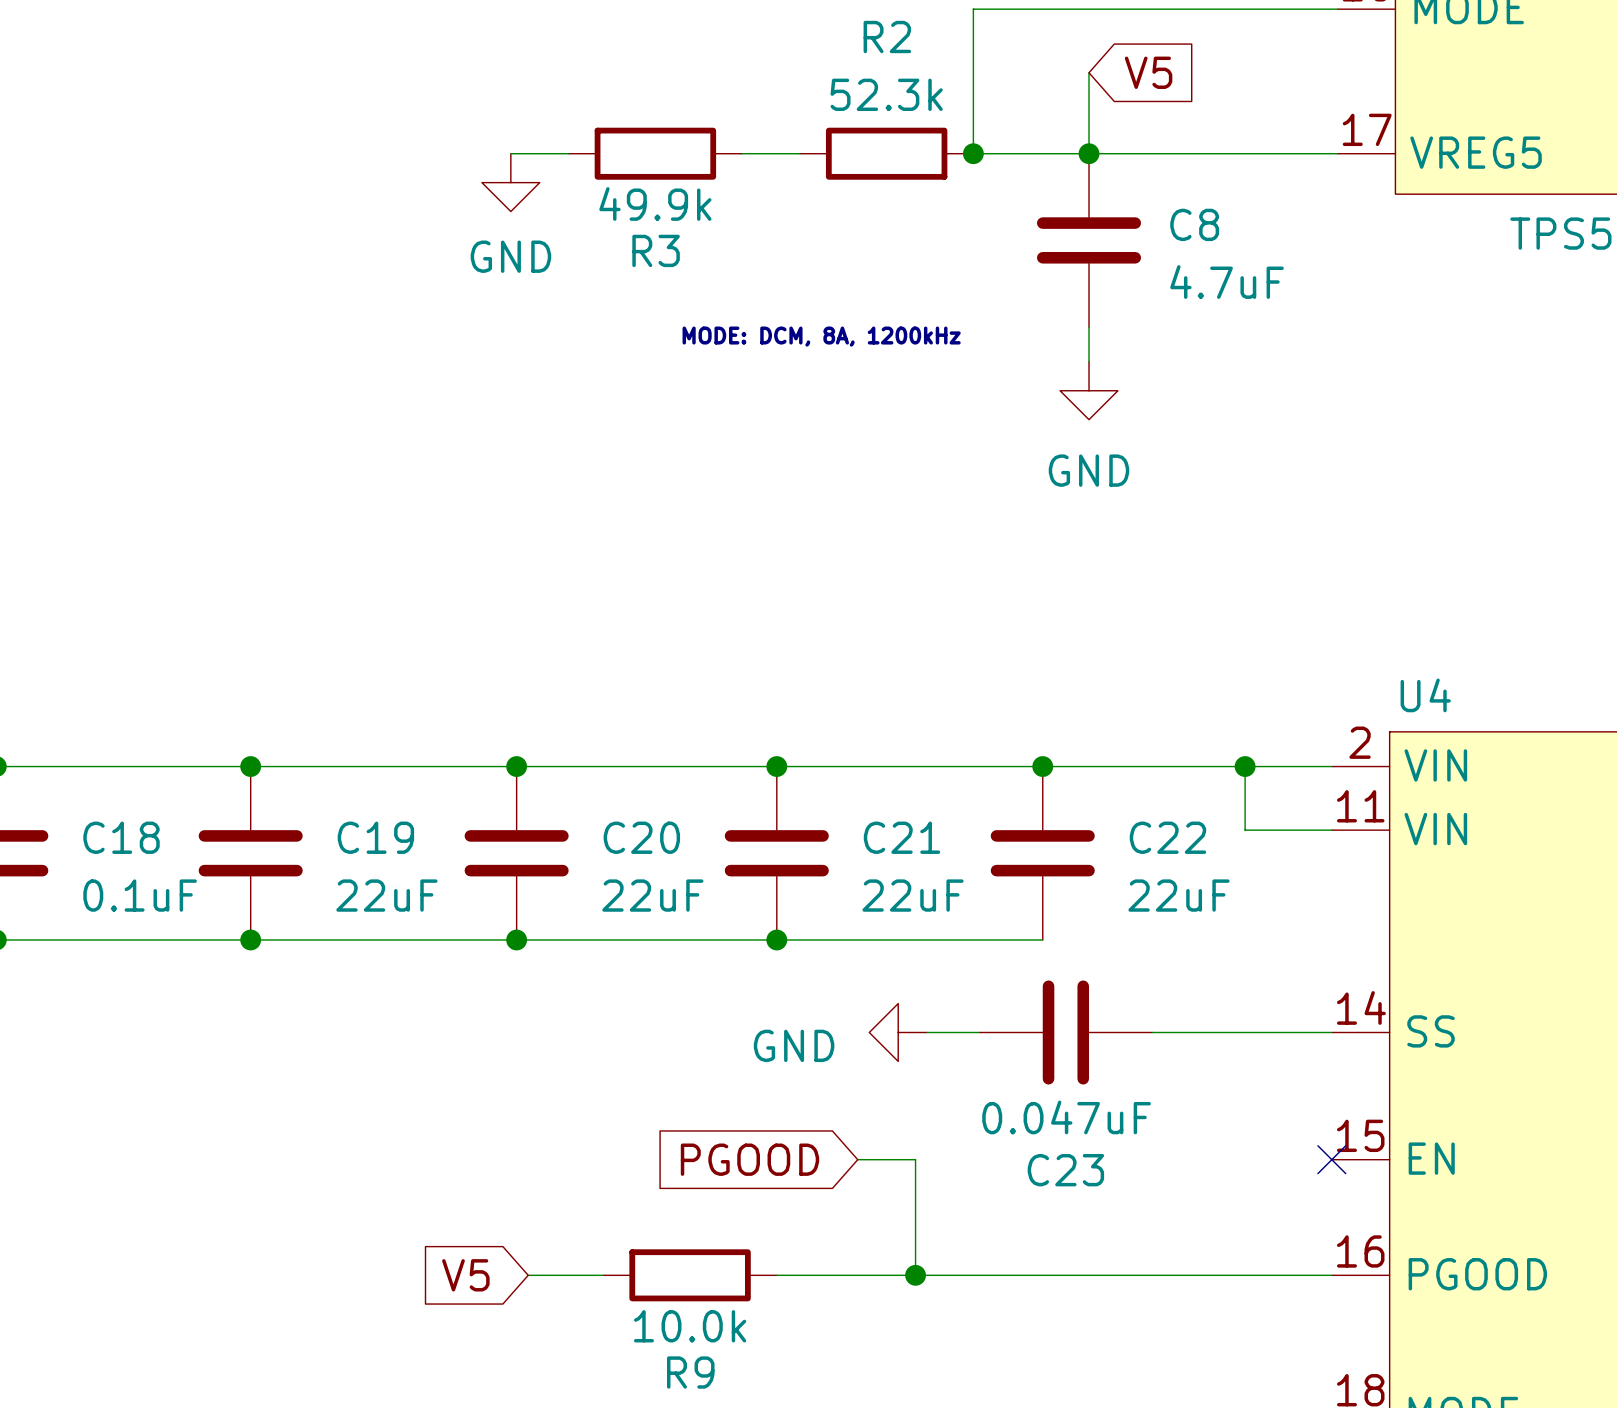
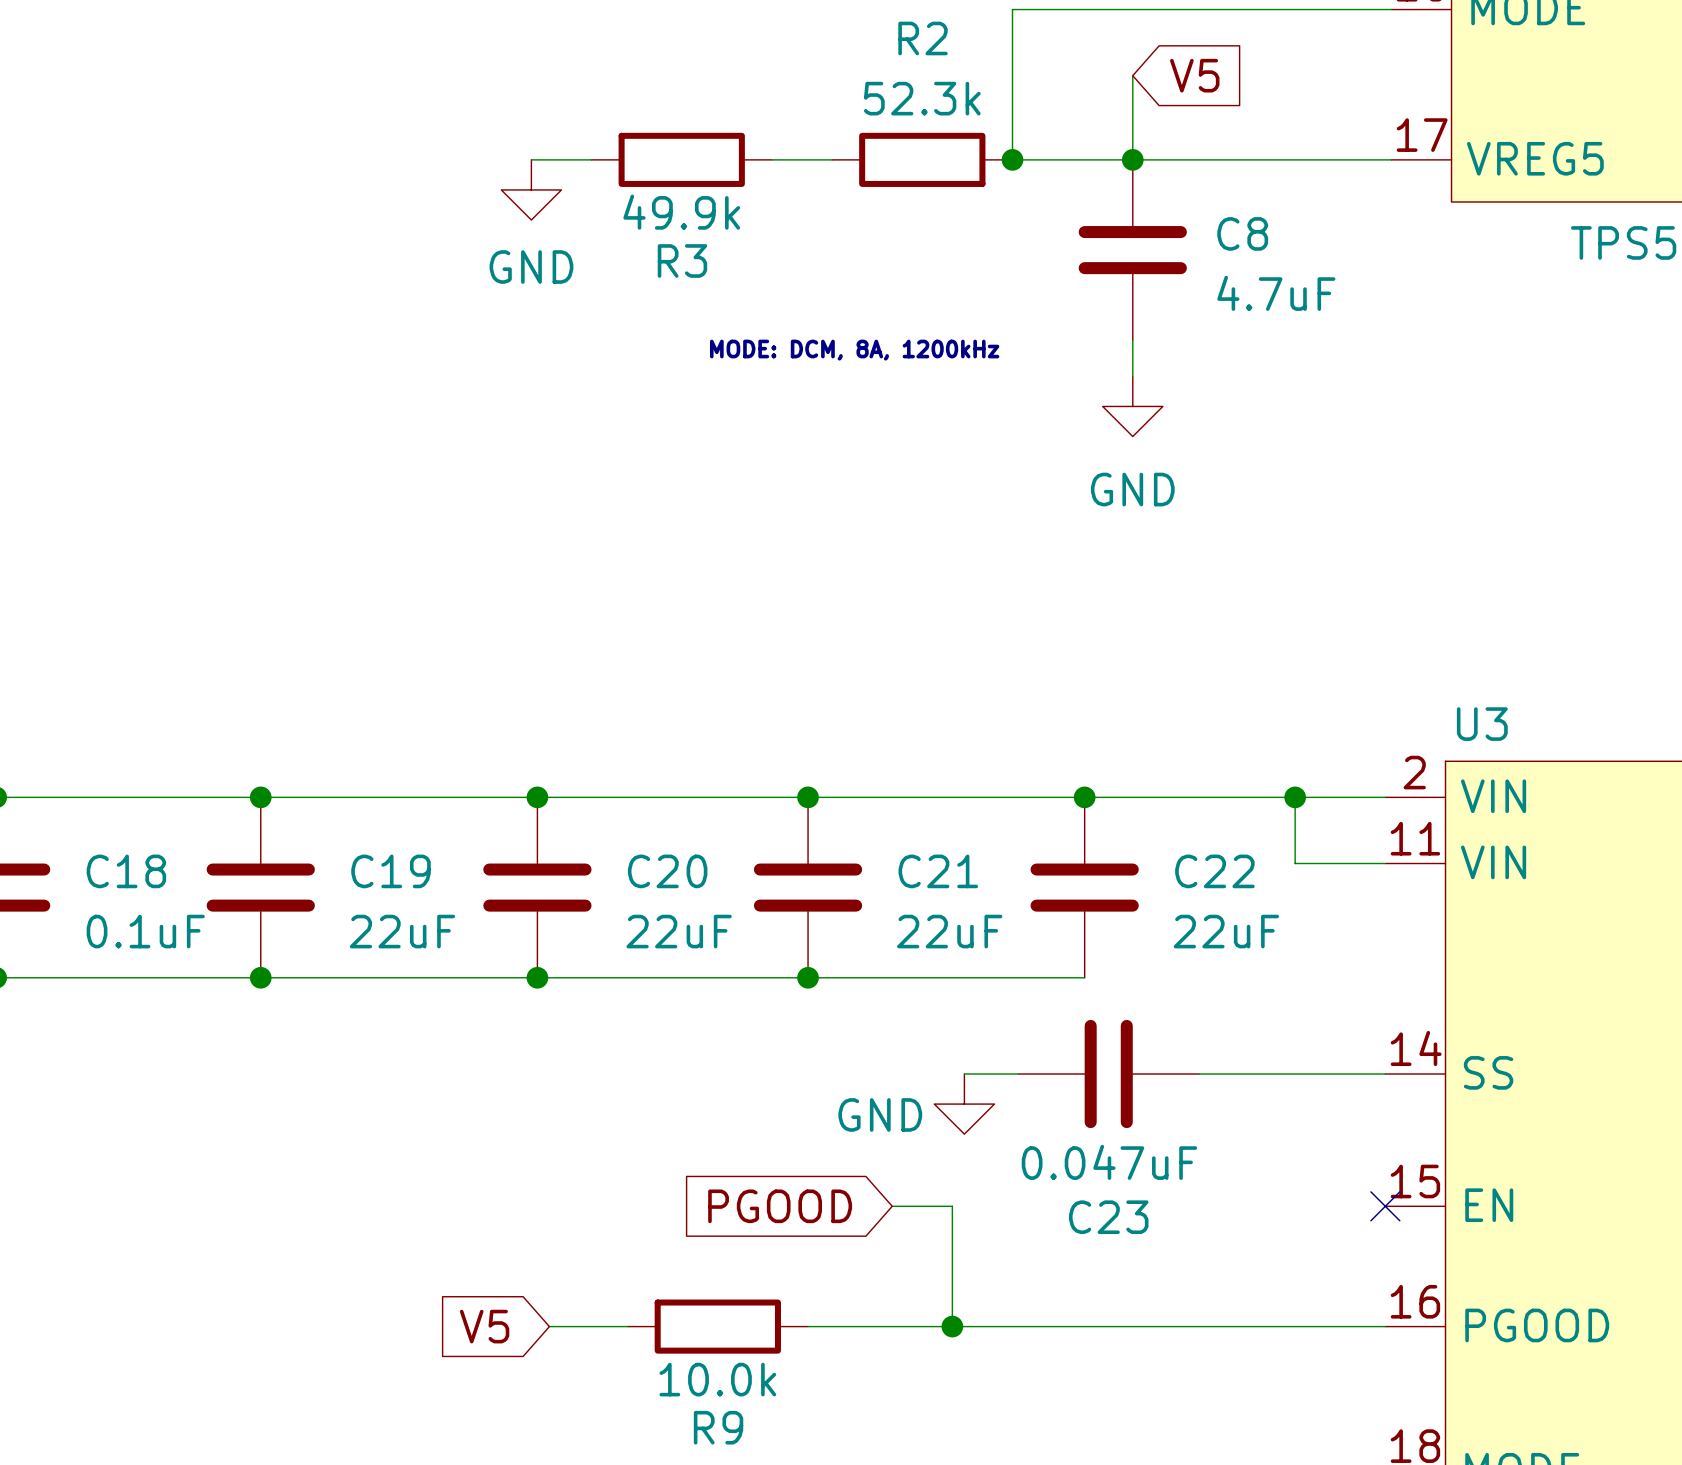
U4 name: U4 (1425, 695) -> U3 (1482, 724)
power symbol rotation: 0° (898, 1032) -> 90° counterclockwise (964, 1104)
power symbol position: GND (898, 1032) -> GND (964, 1104)

